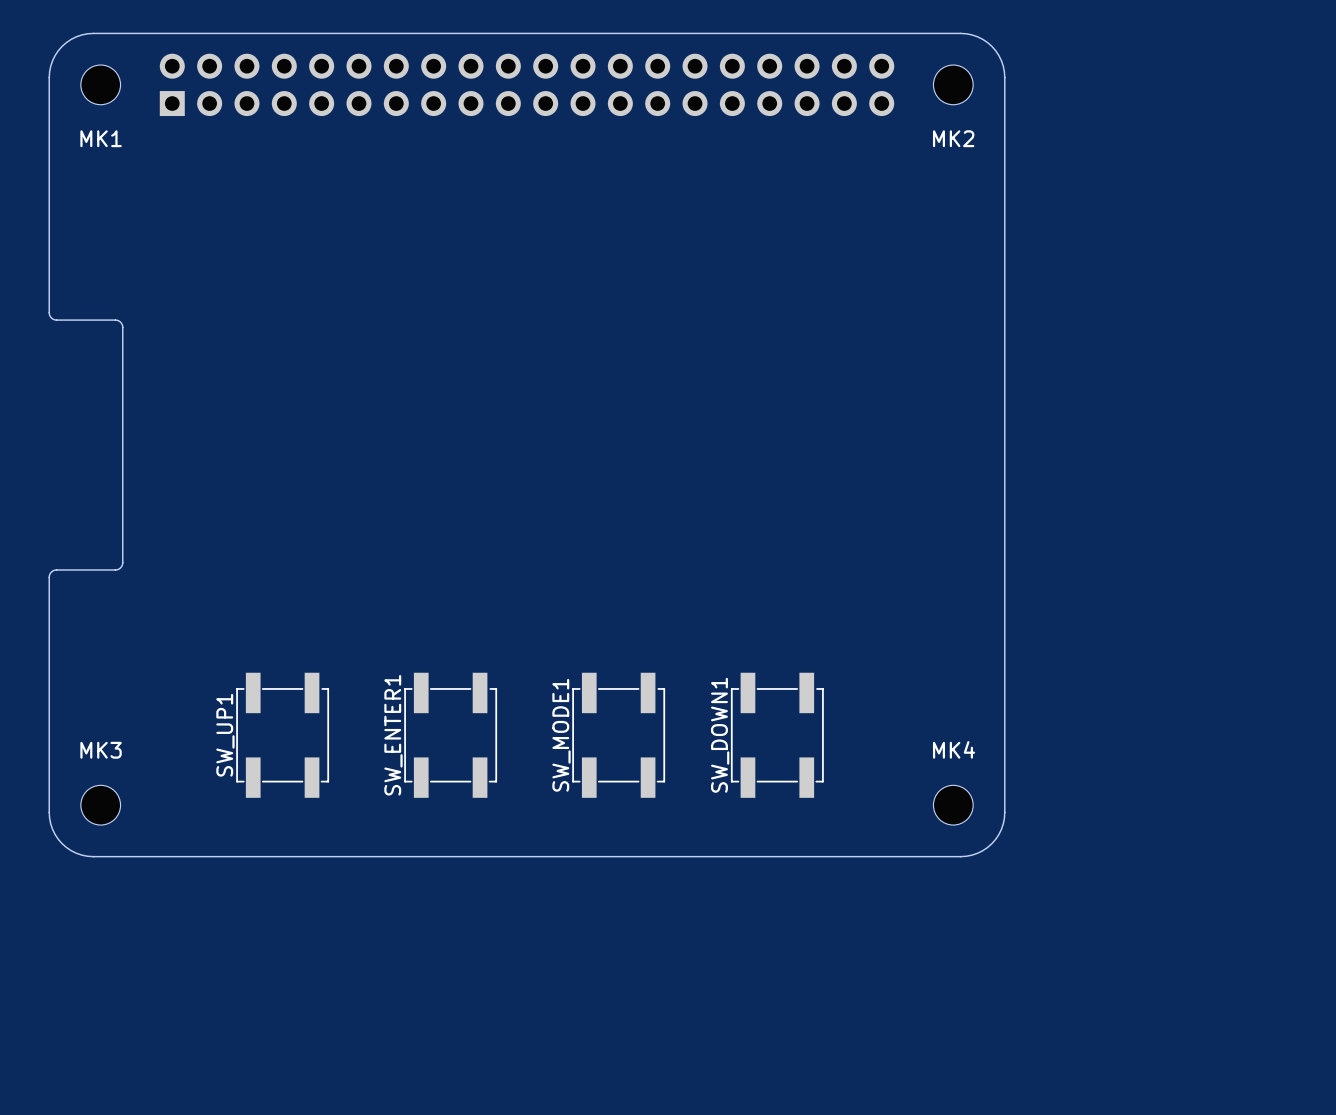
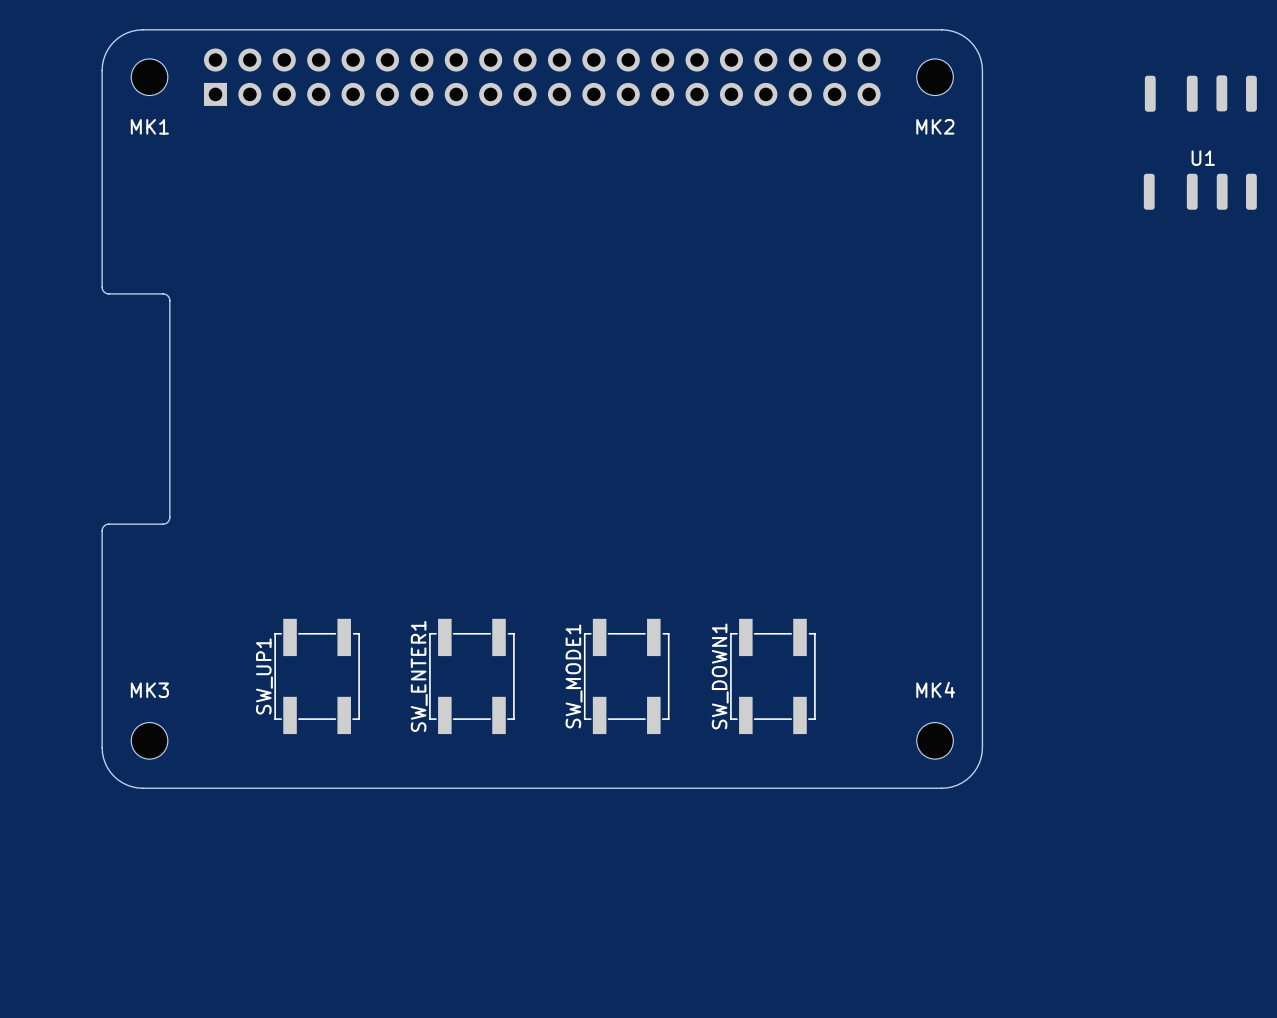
U1: none -> (1200, 142)

